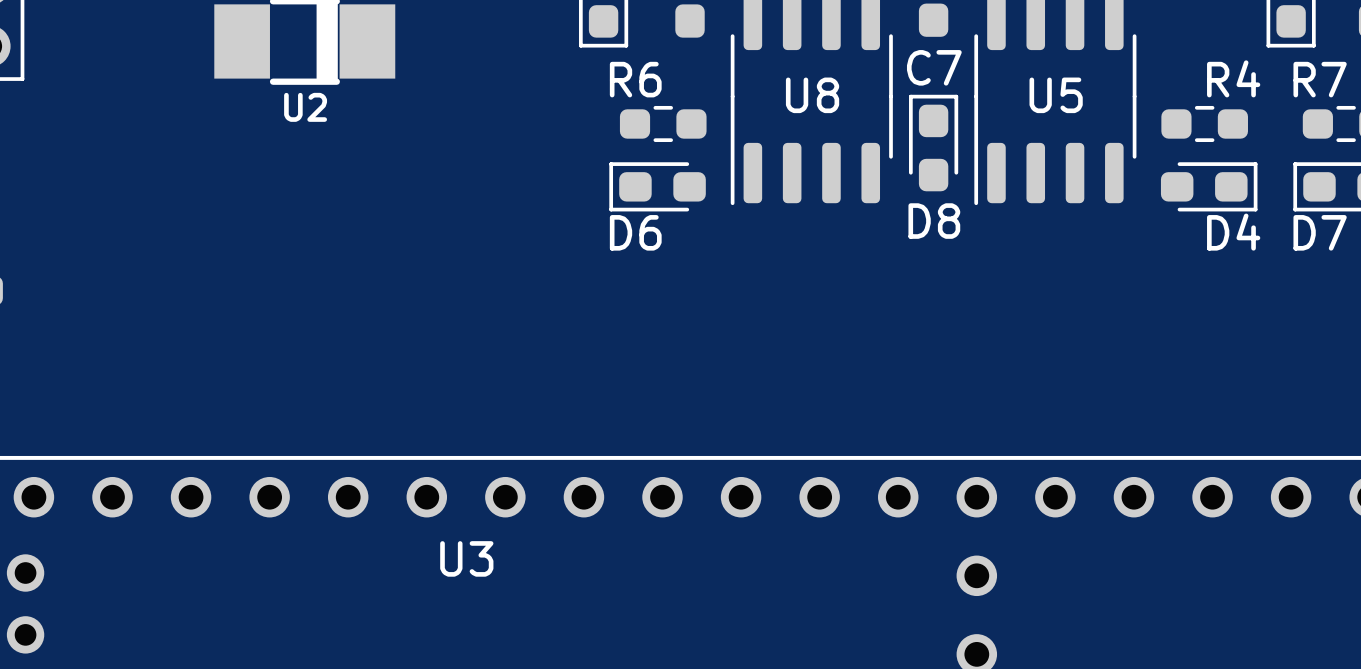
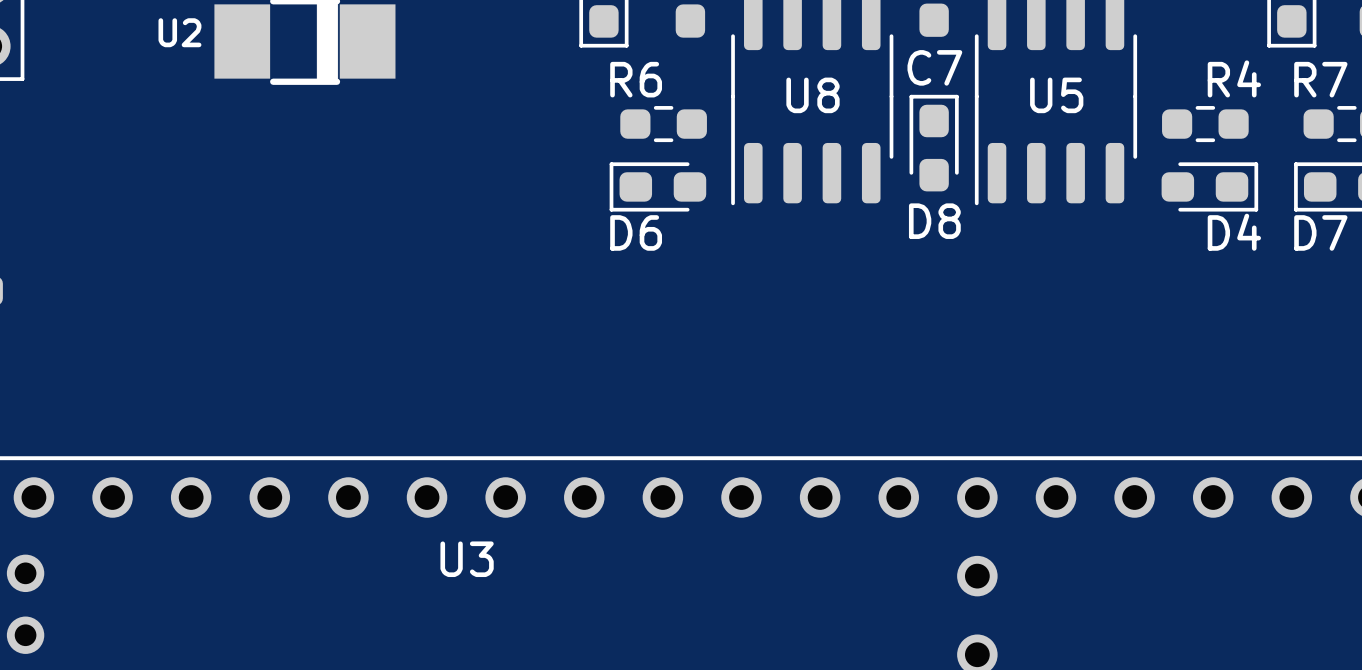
U2 name position: U2 (305, 107) -> U2 (179, 32)

